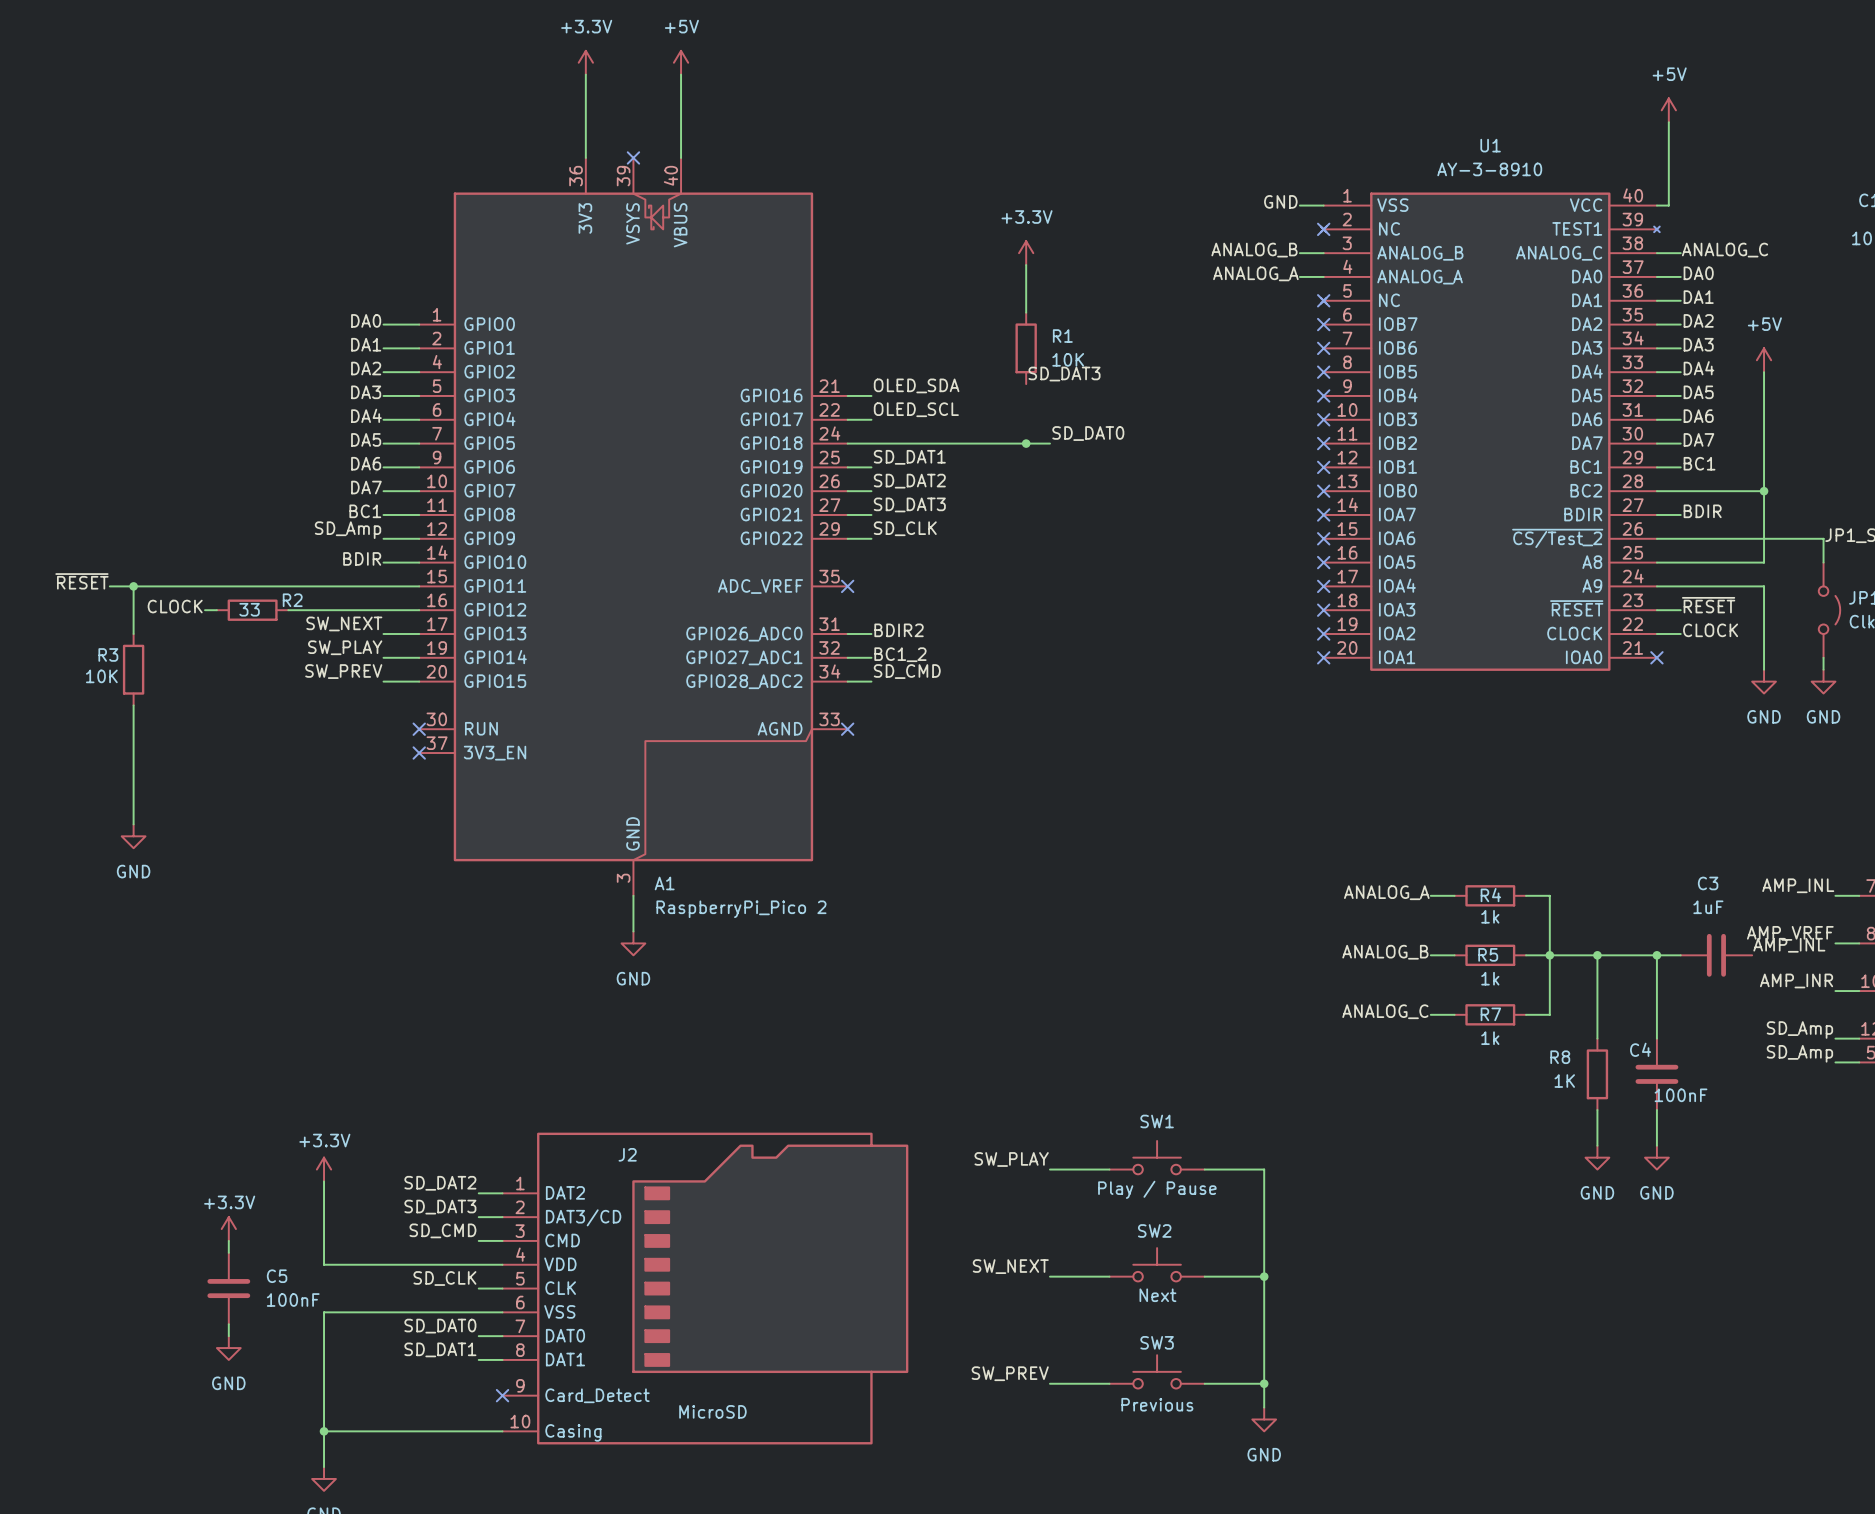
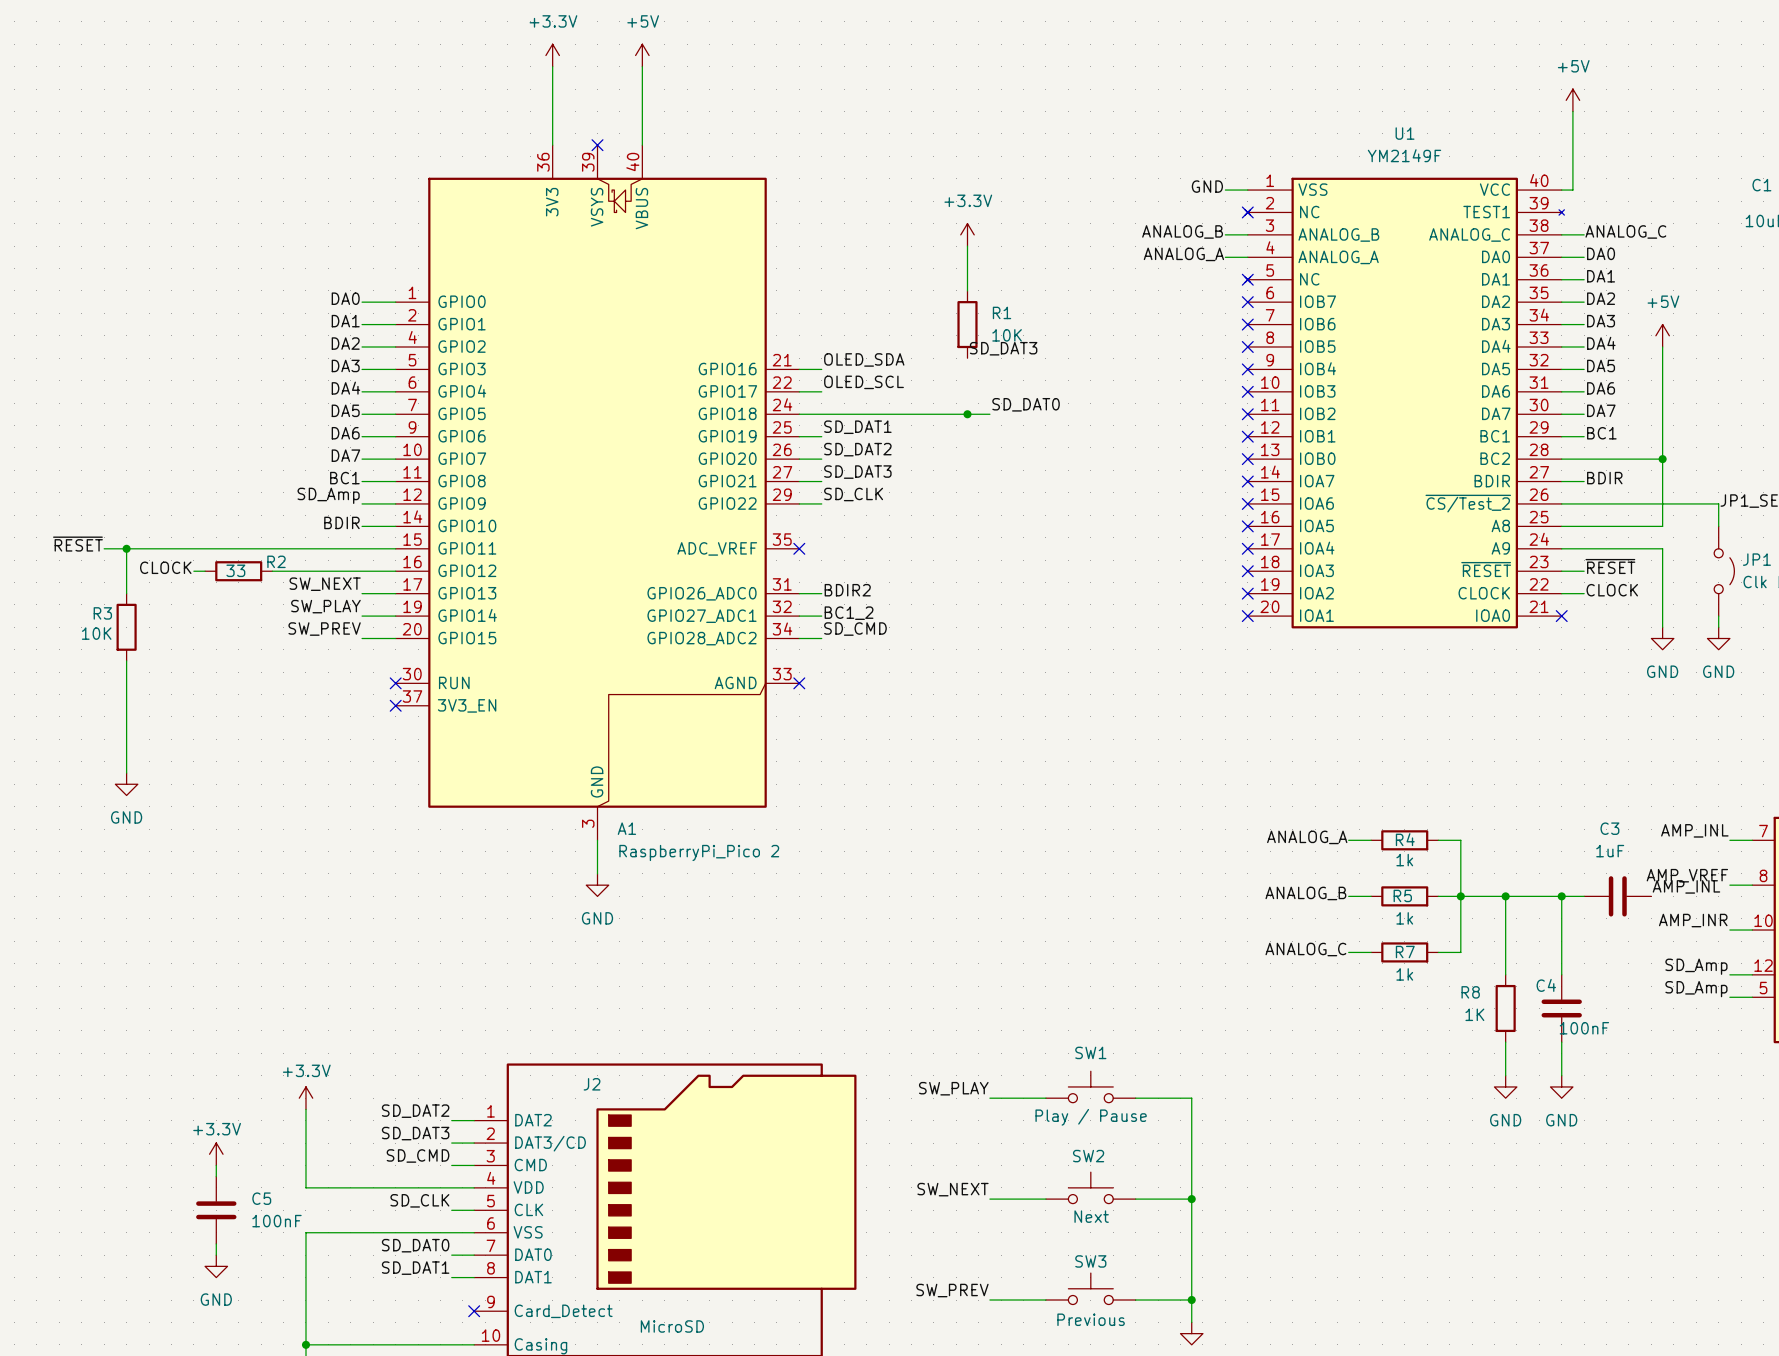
U1 value: AY-3-8910 (1489, 169) -> YM2149F (1404, 155)

